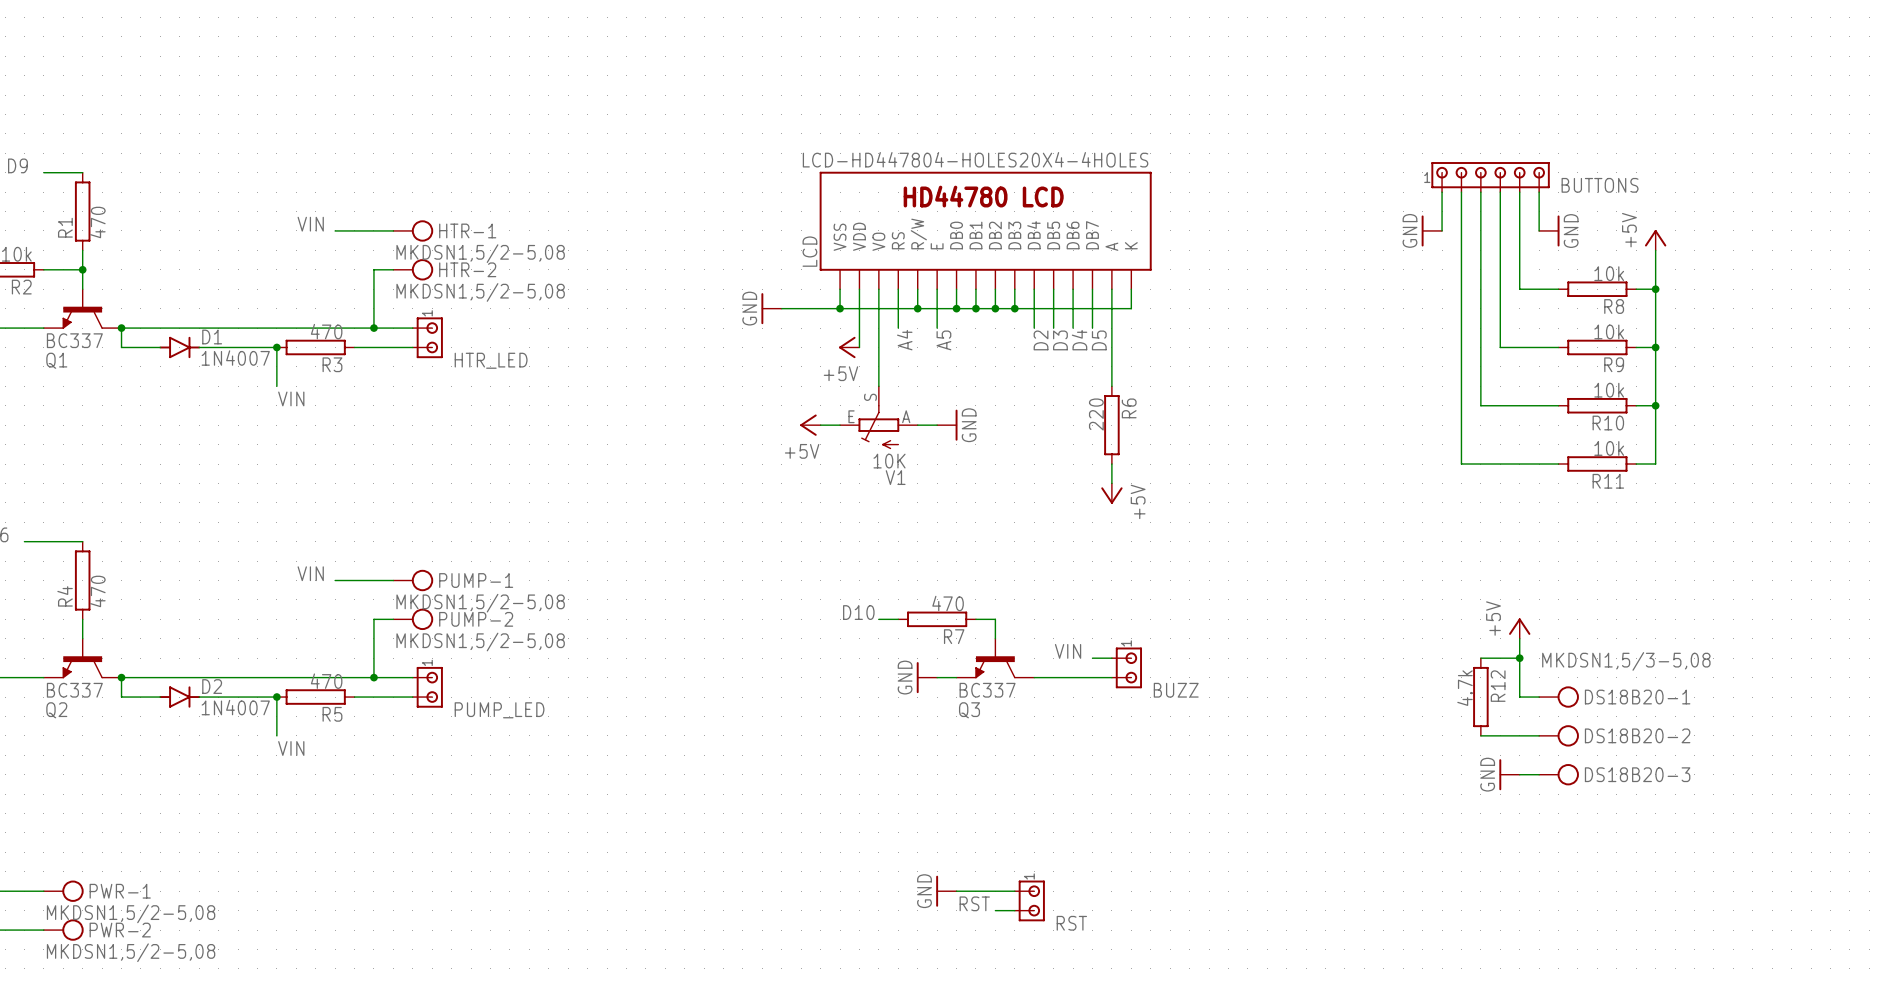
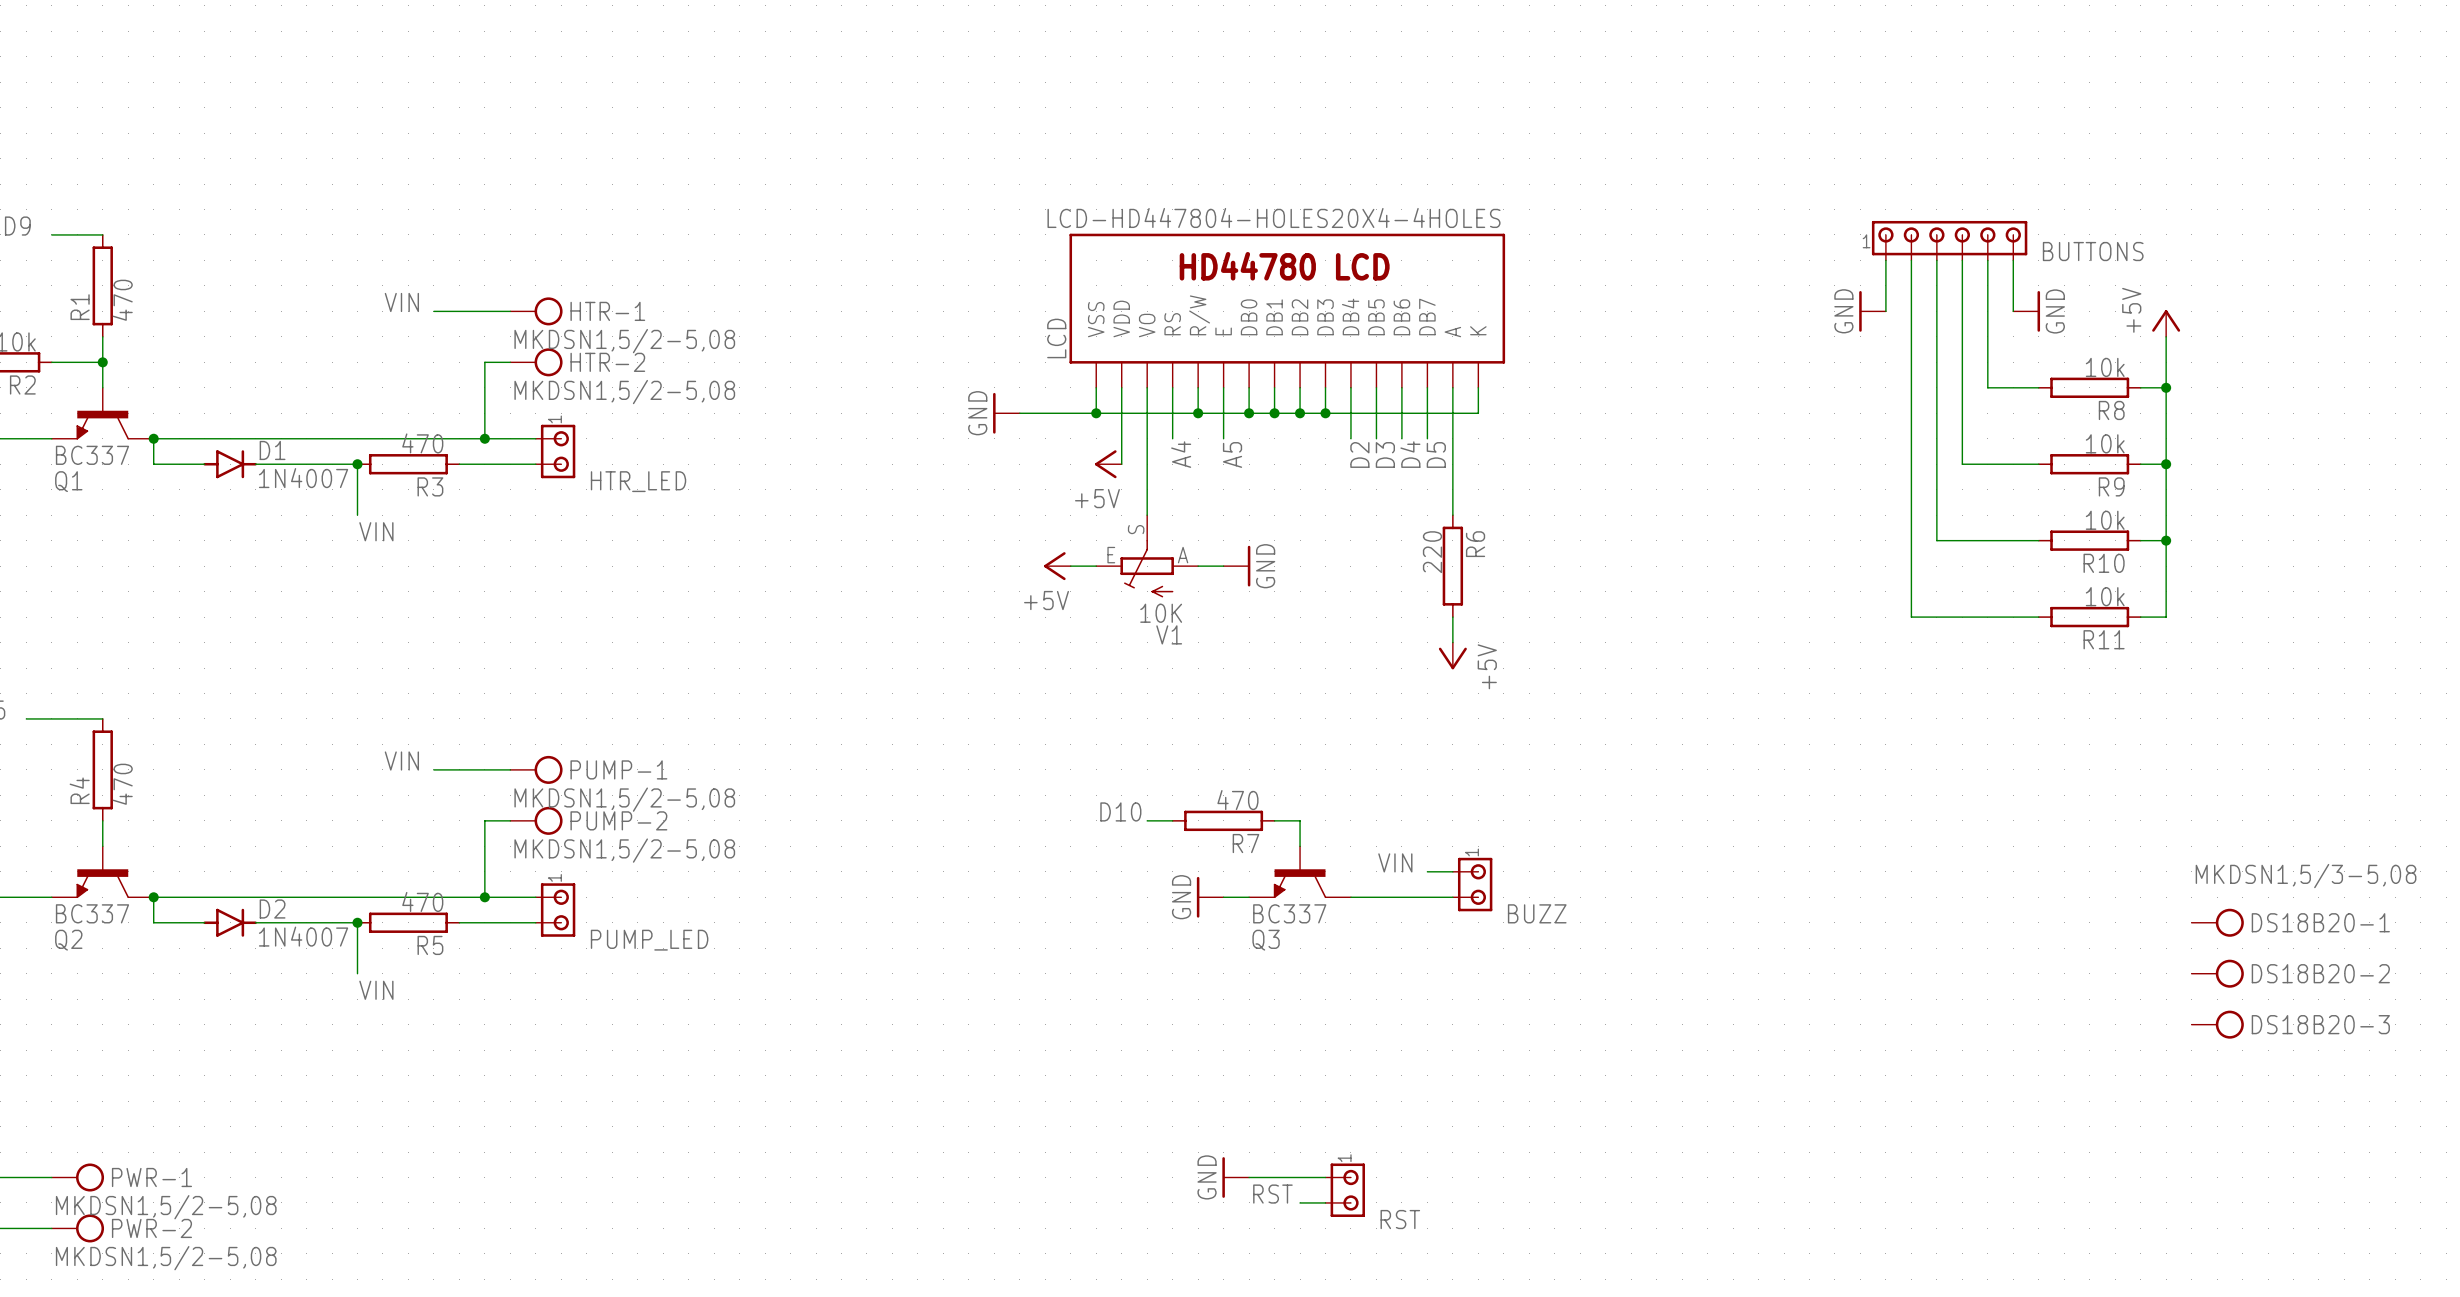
power symbol: +5V (1519, 628) -> none
wire: (1519, 638) (1519, 697) (1539, 697) -> none
wire: (1480, 658) (1519, 658) -> none
junction: (1519, 658) -> none
R12: 4.7k (1480, 697) -> none
DS18B20-1 position: (1559, 697) -> (2217, 922)
wire: (1480, 735) (1539, 735) -> none
DS18B20-2 position: (1559, 735) -> (2217, 973)
power symbol: GND (1509, 774) -> none
wire: (1519, 774) (1539, 774) -> none
DS18B20-3 position: (1559, 774) -> (2217, 1024)

